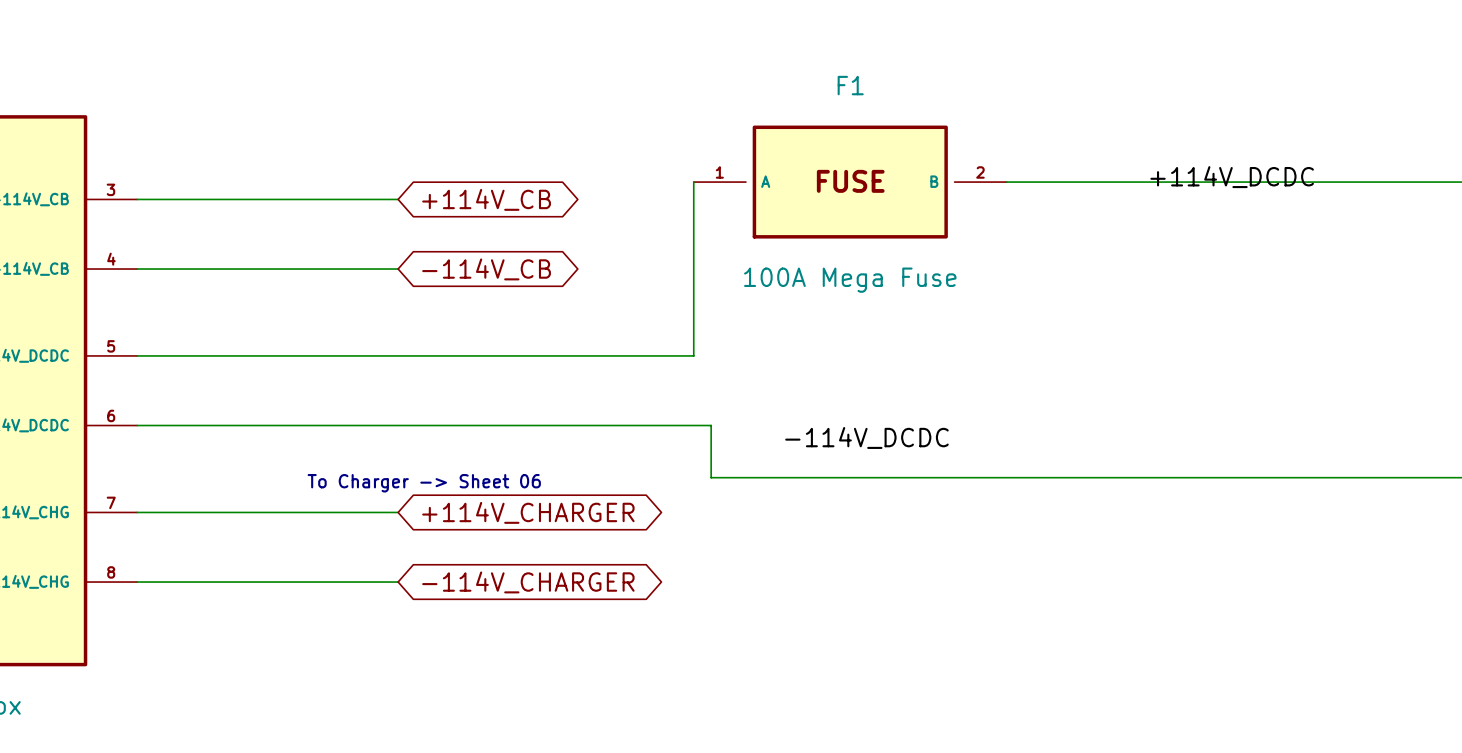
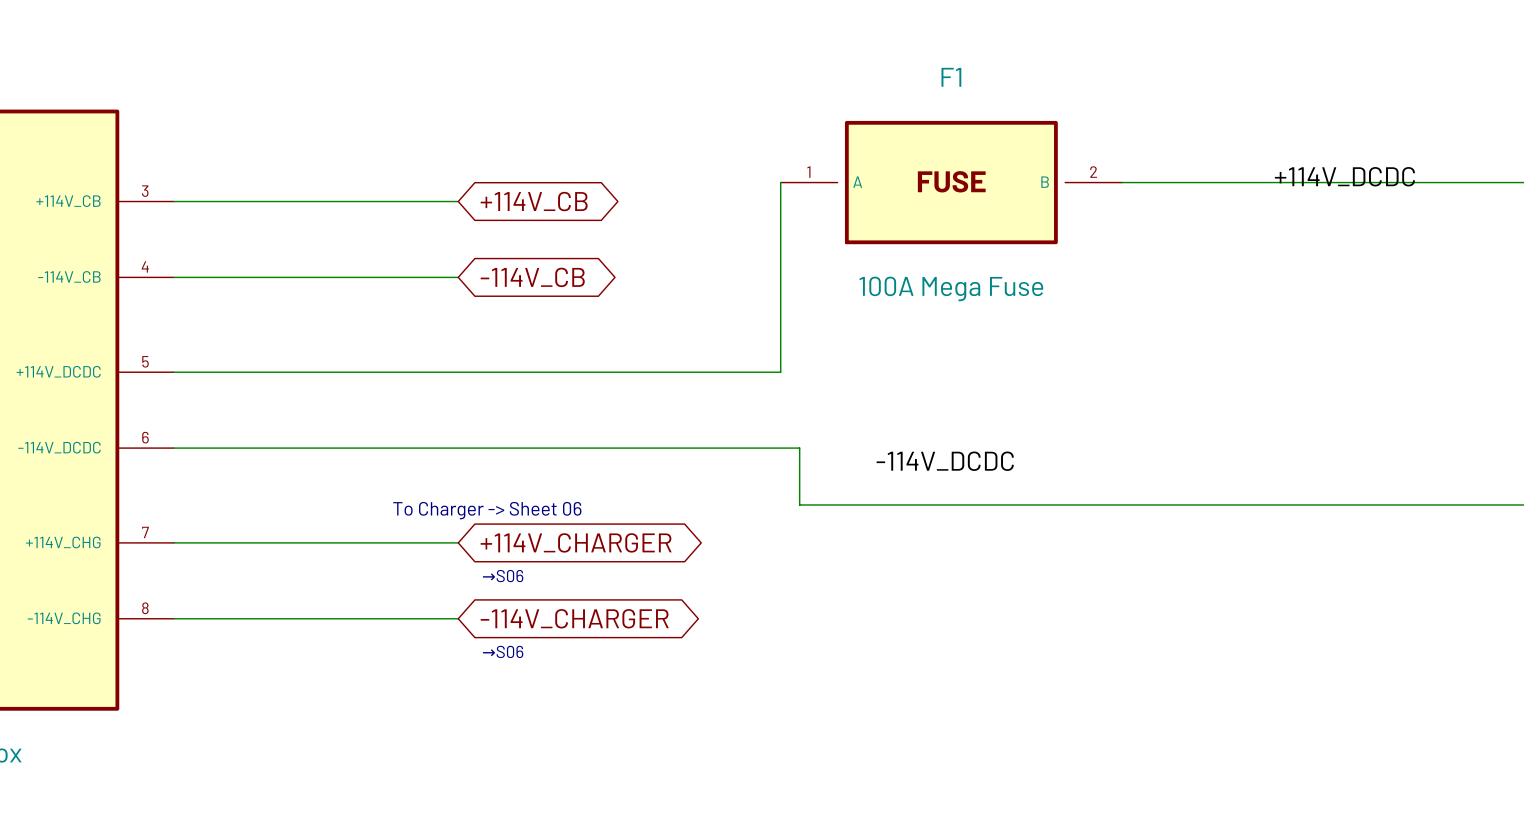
text: none -> →S06 (503, 576)
text: none -> →S06 (503, 651)

